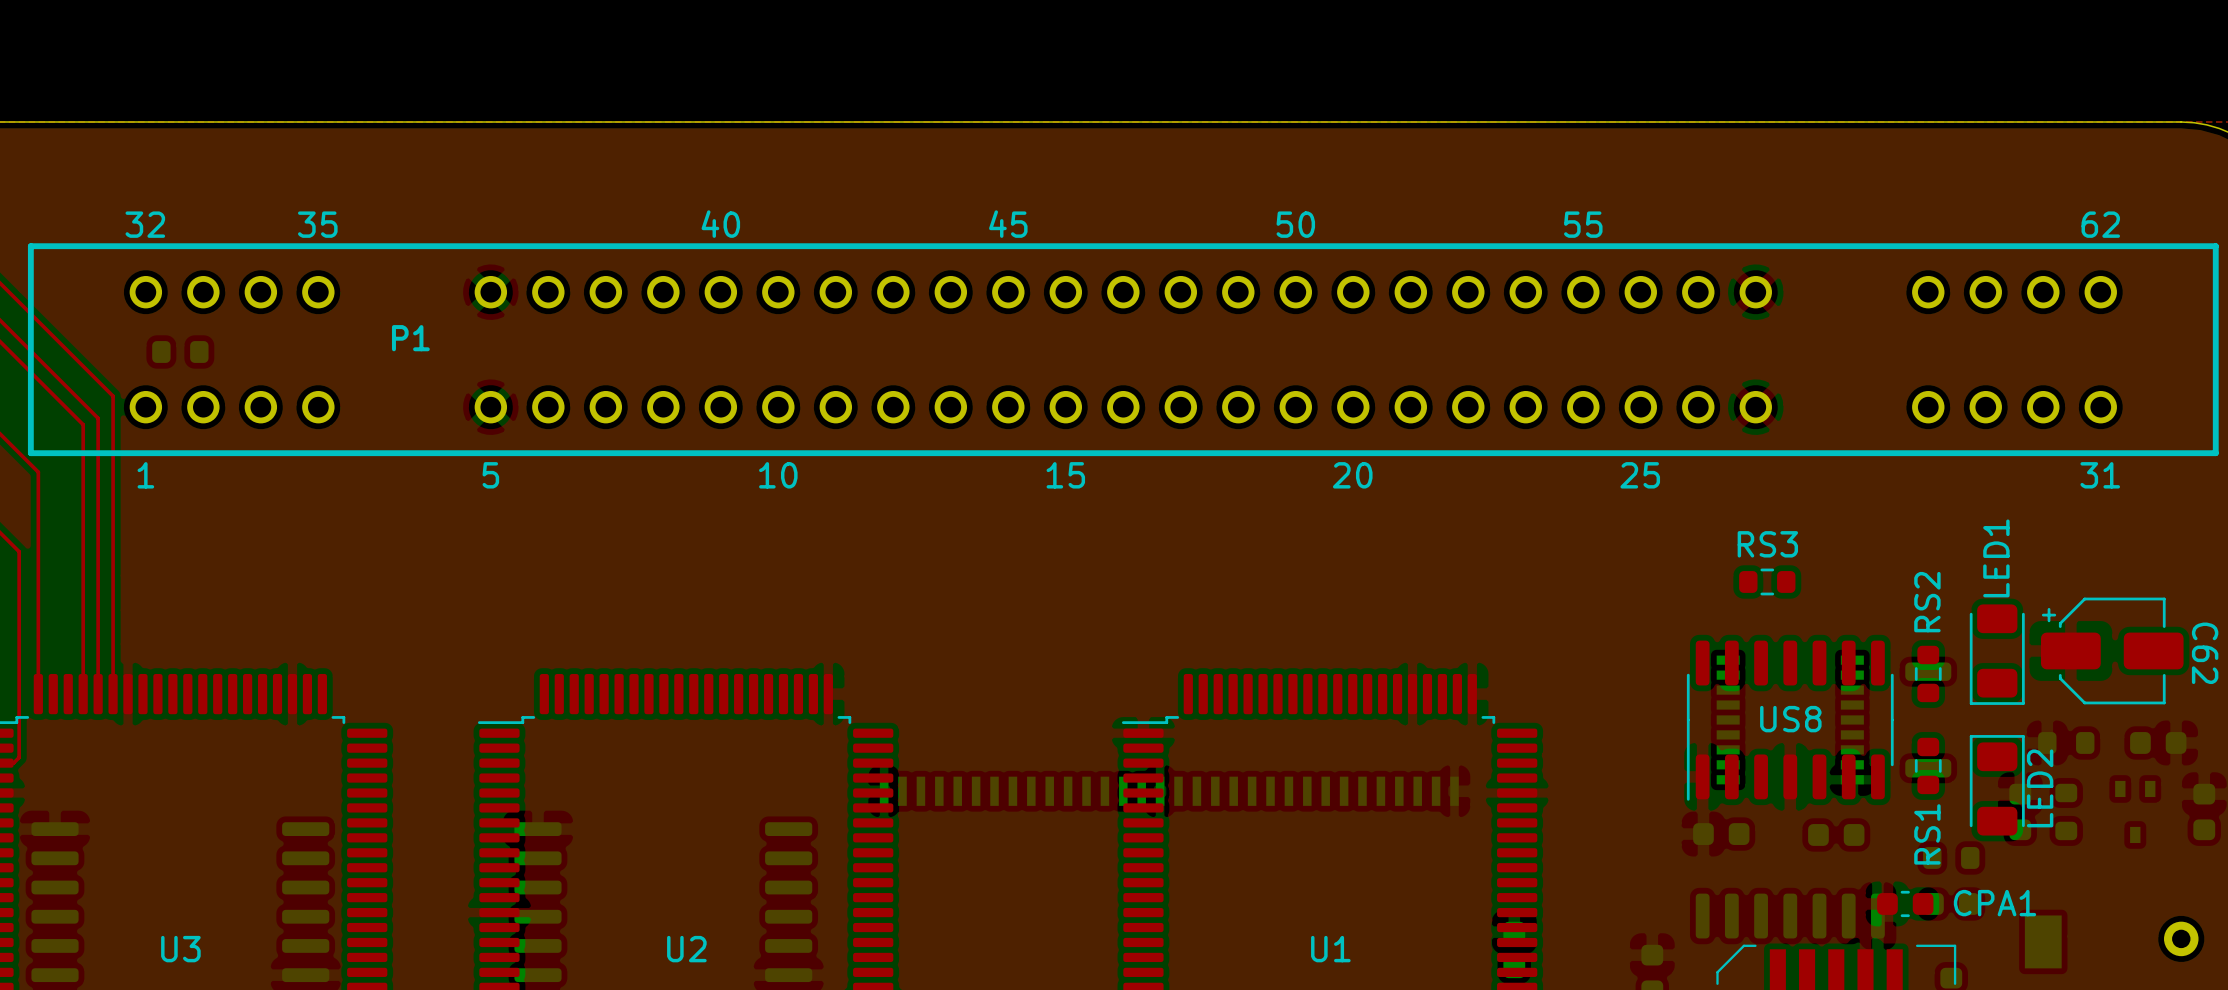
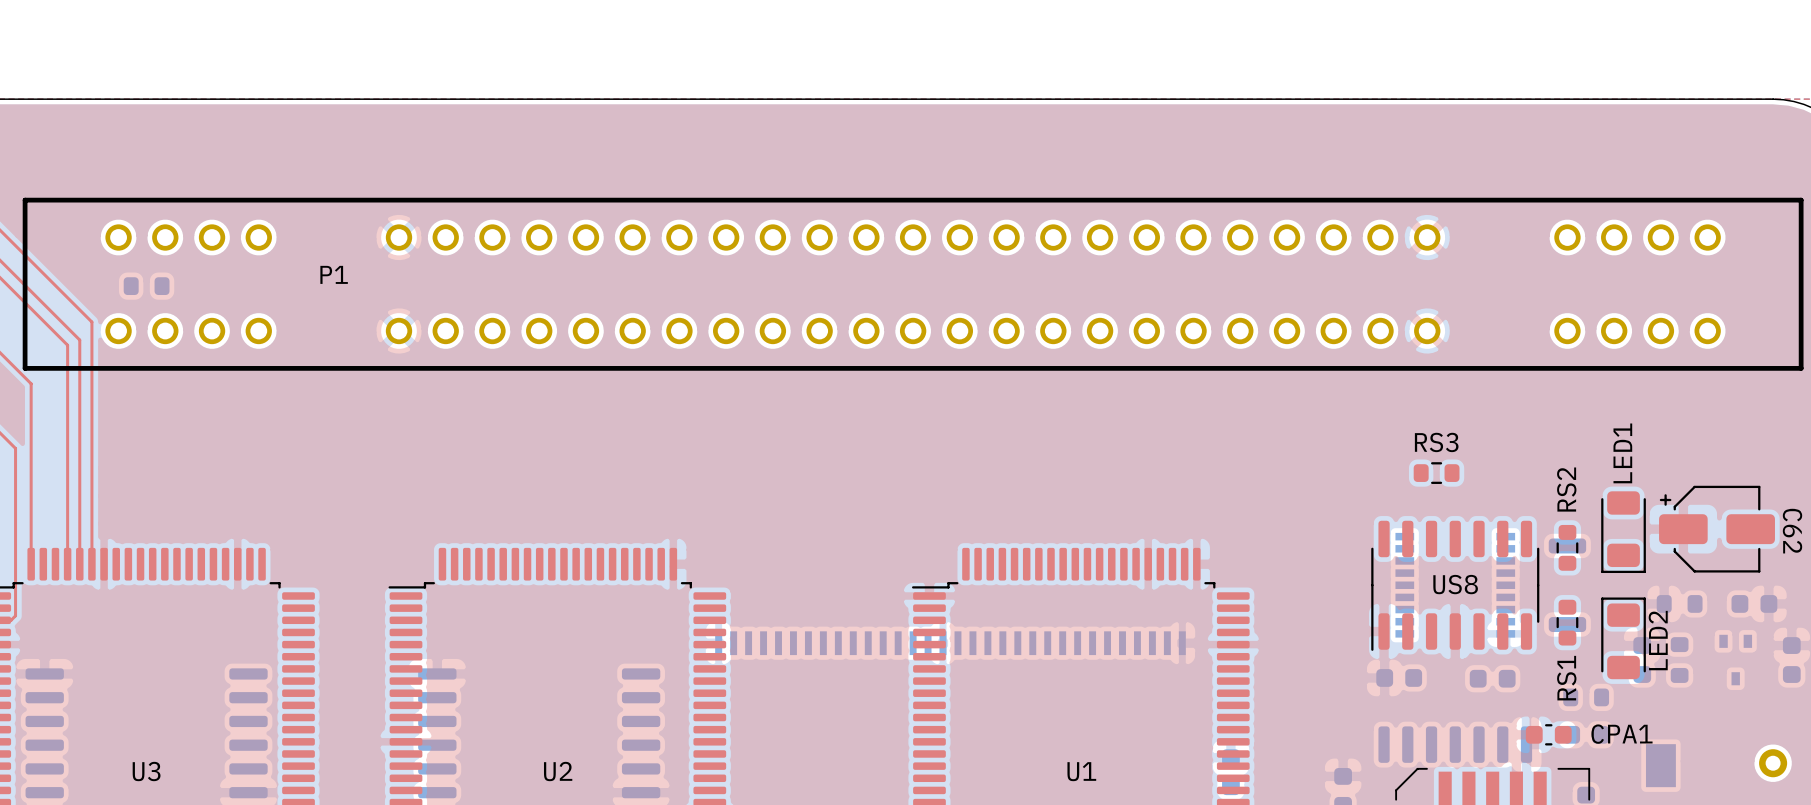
P1 footprint: [27, 243, 2219, 457] -> [22, 197, 1804, 371]

